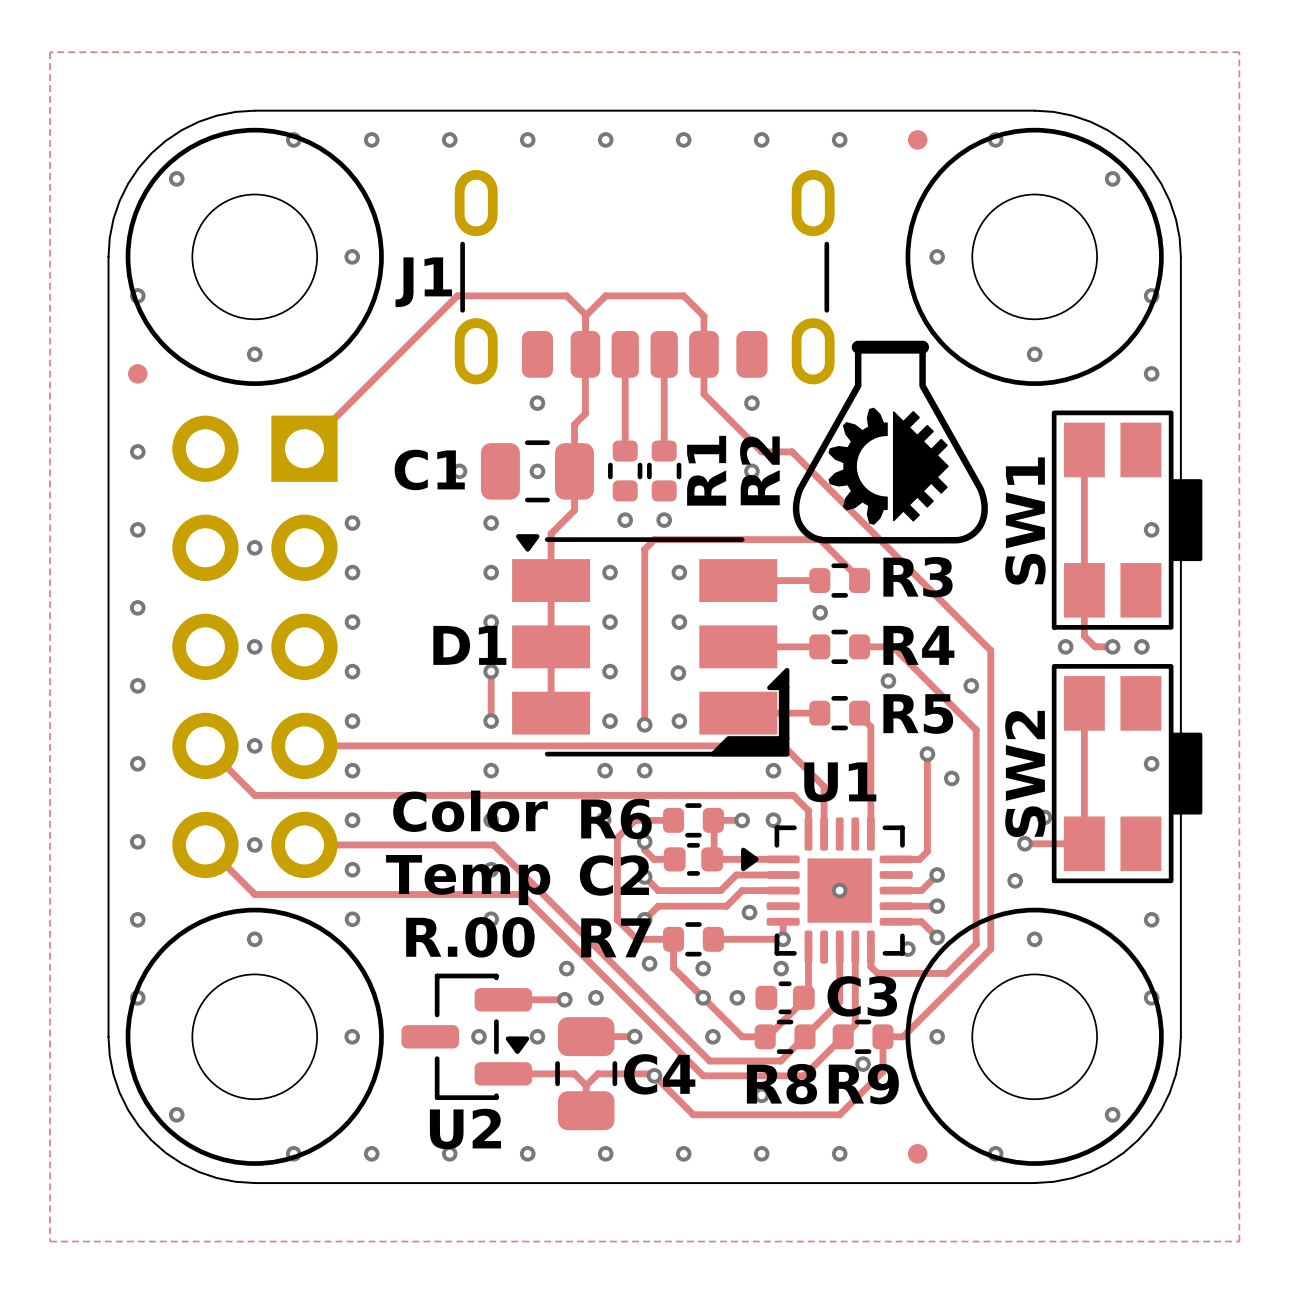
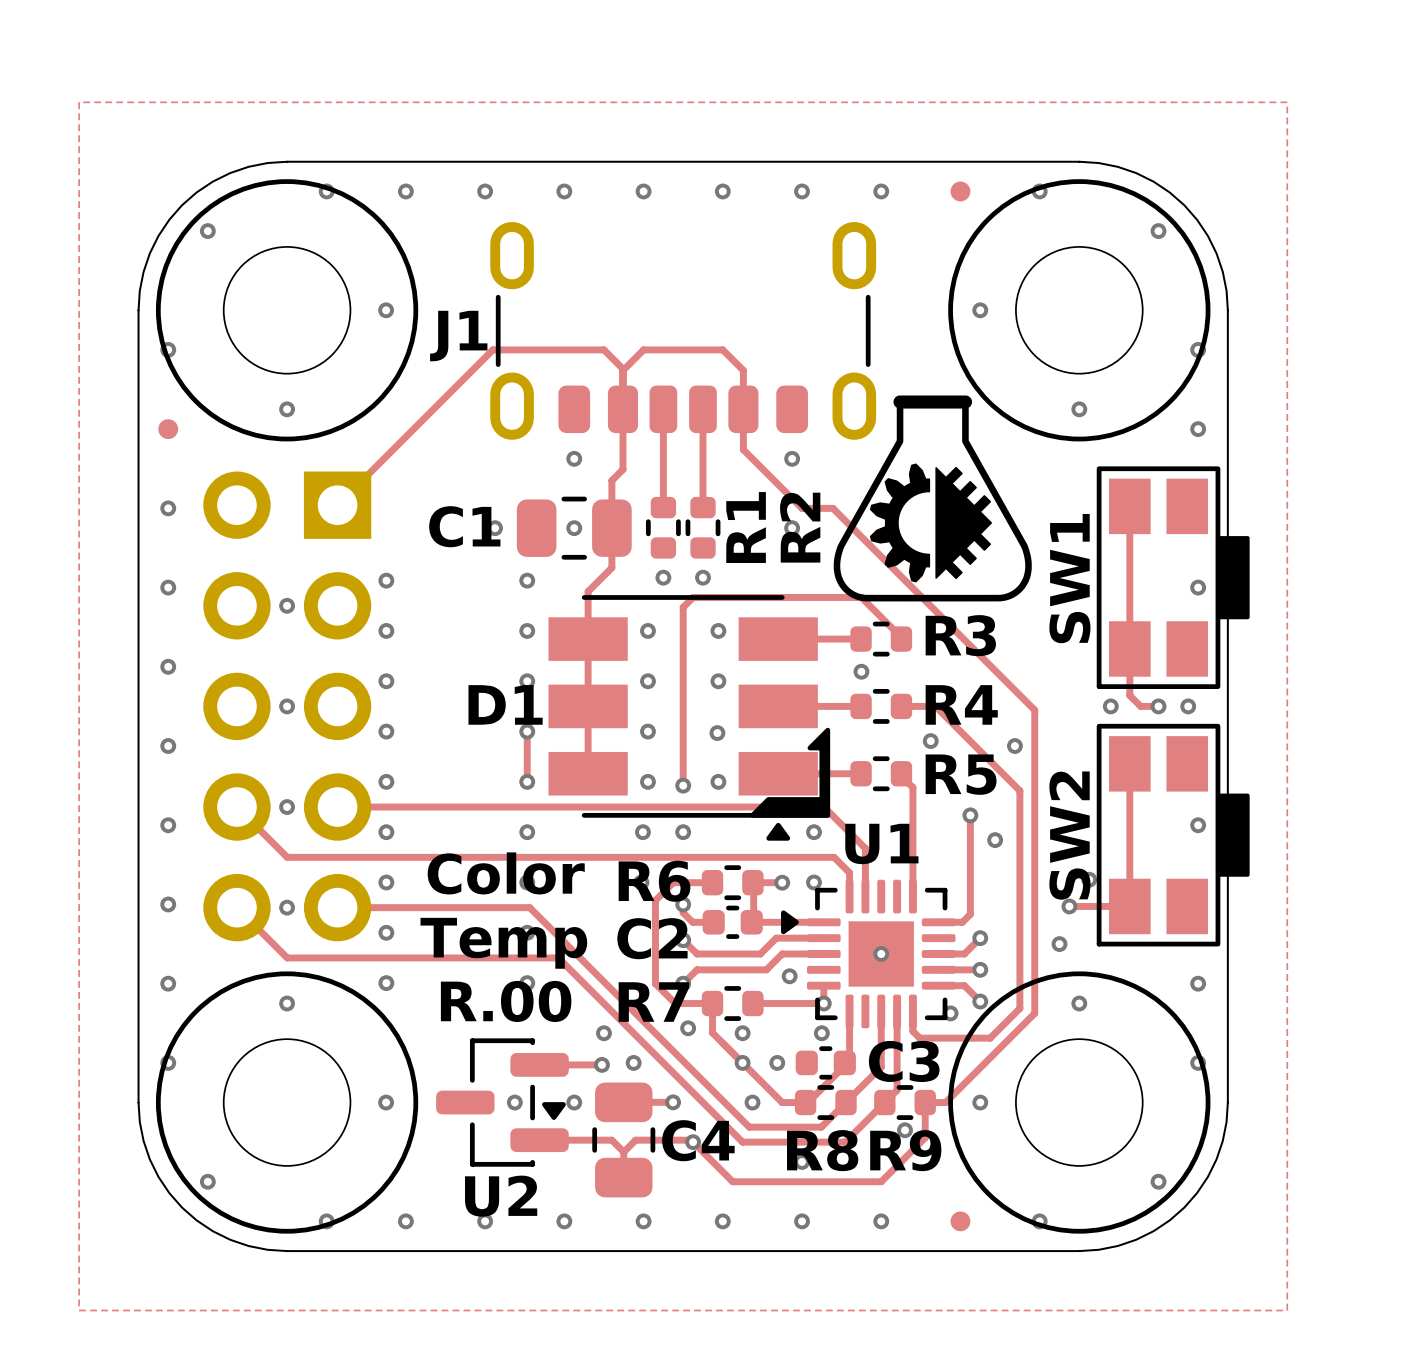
D1 footprint: [512, 534, 790, 757] -> [548, 595, 831, 841]

